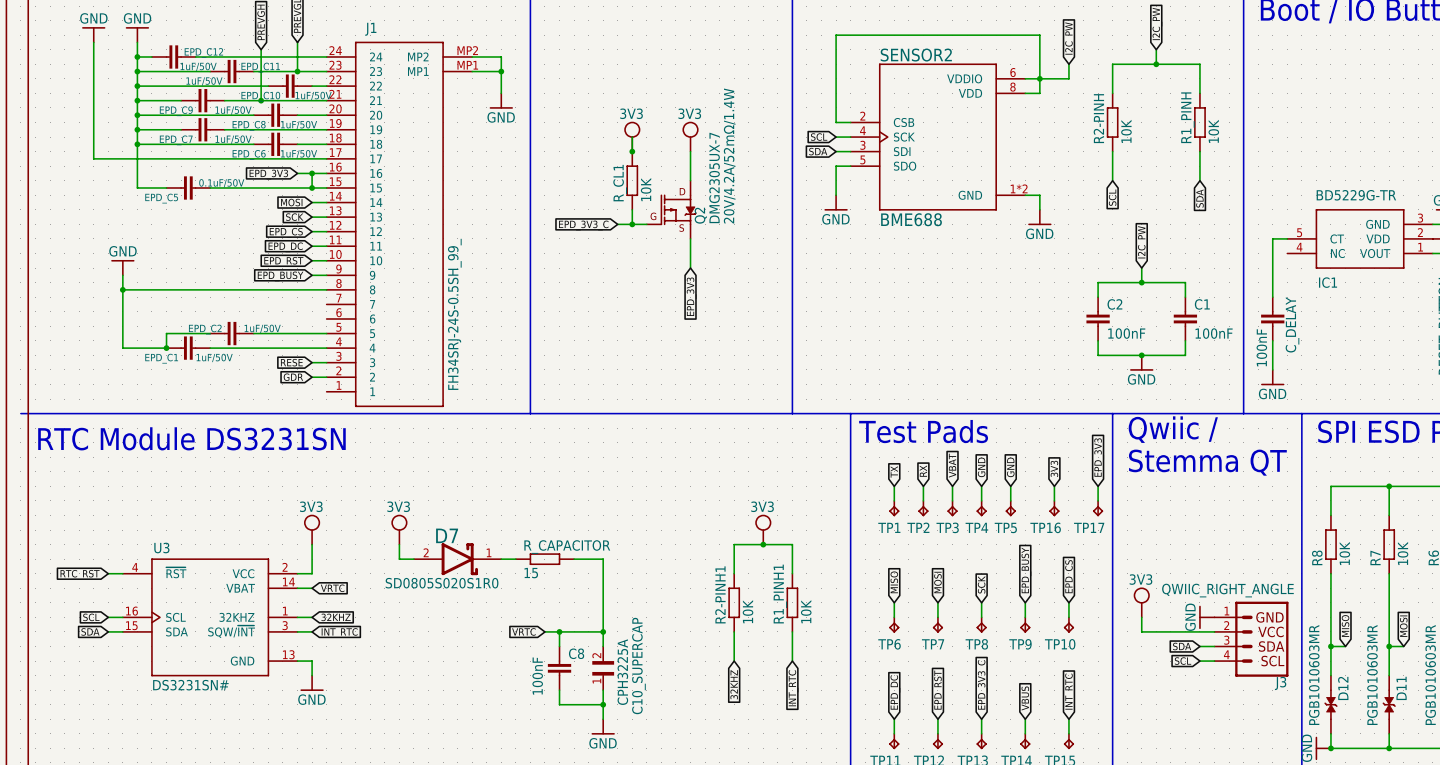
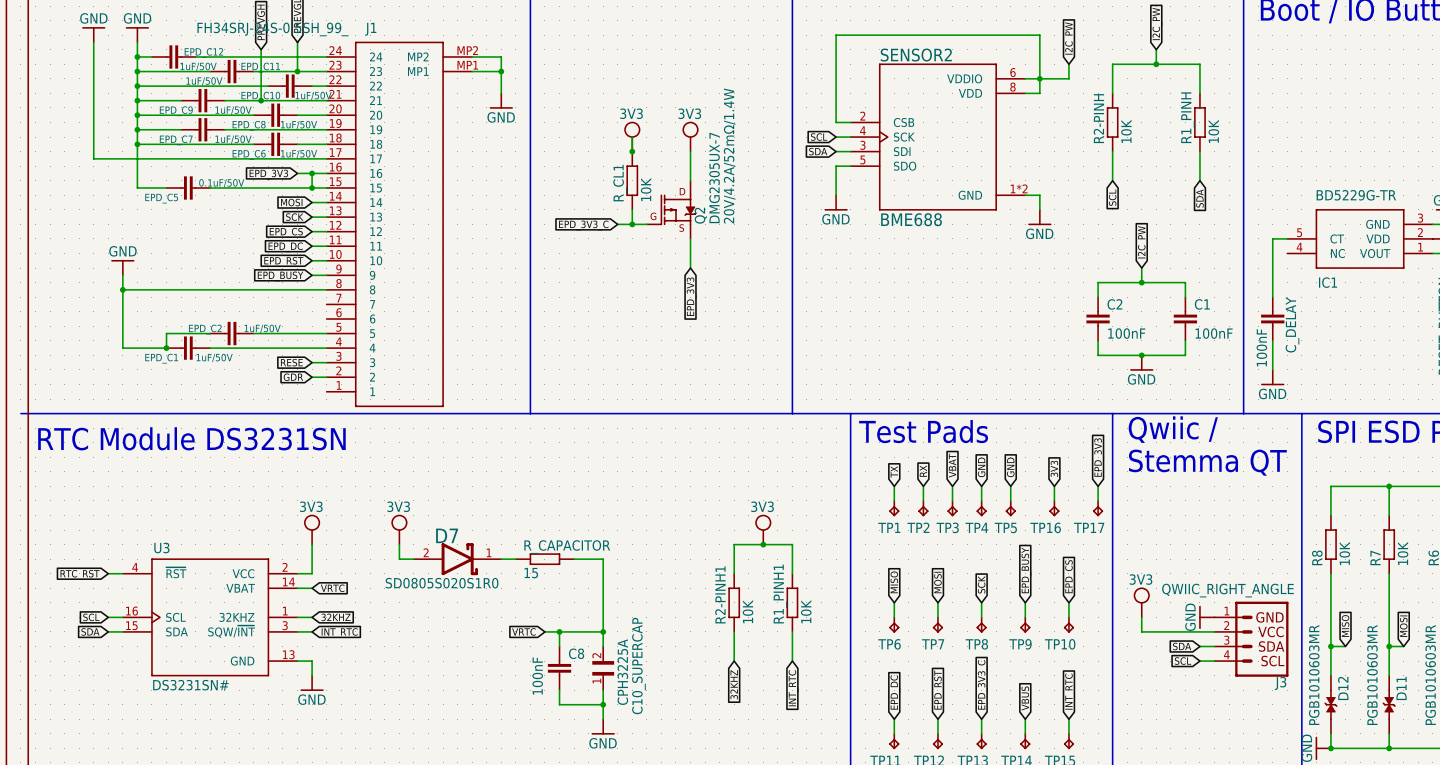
J1 value rotation: 0° (454, 314) -> 90° clockwise (273, 29)
J1 value position: FH34SRJ-24S-0.5SH_99_ (454, 314) -> FH34SRJ-24S-0.5SH_99_ (273, 29)

